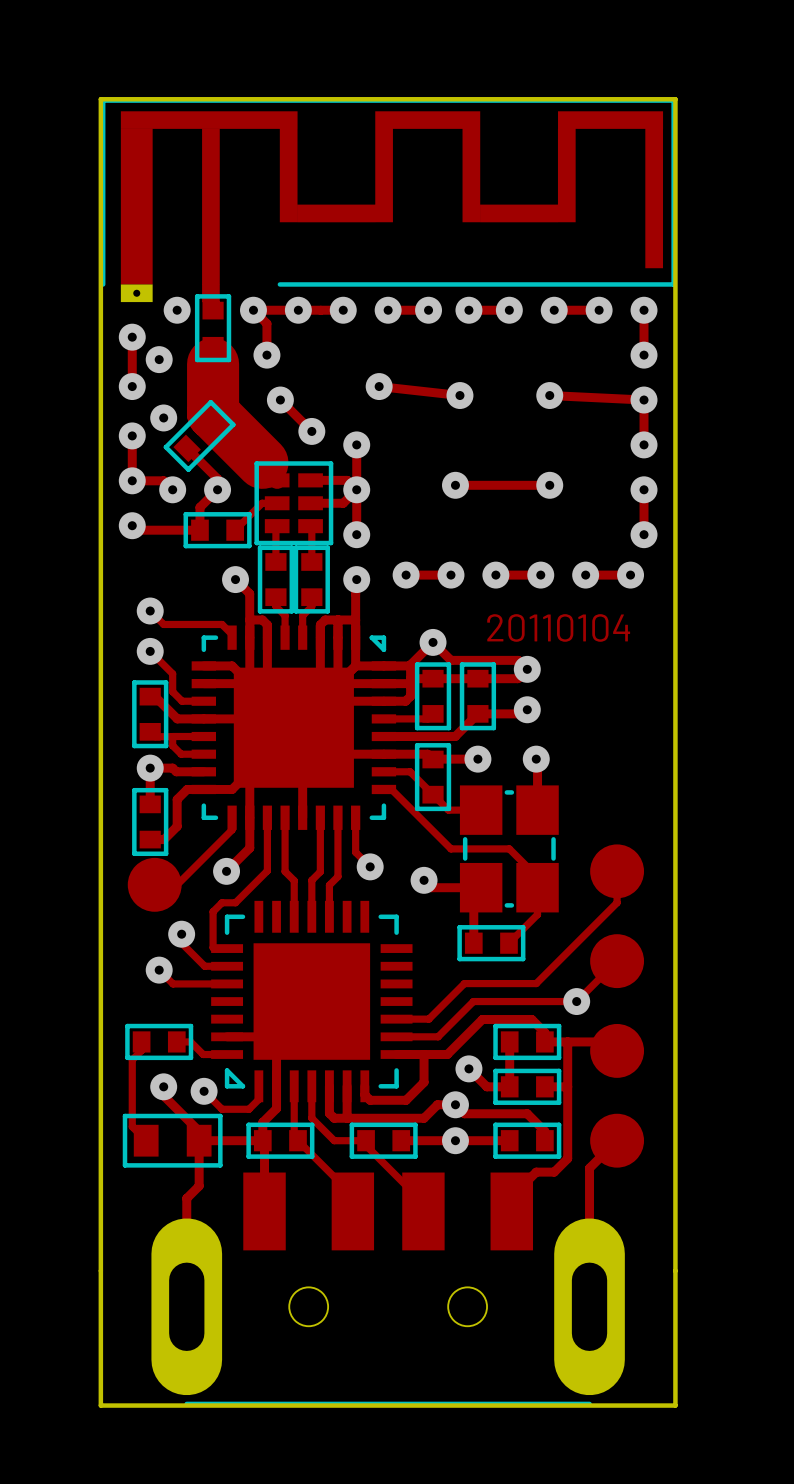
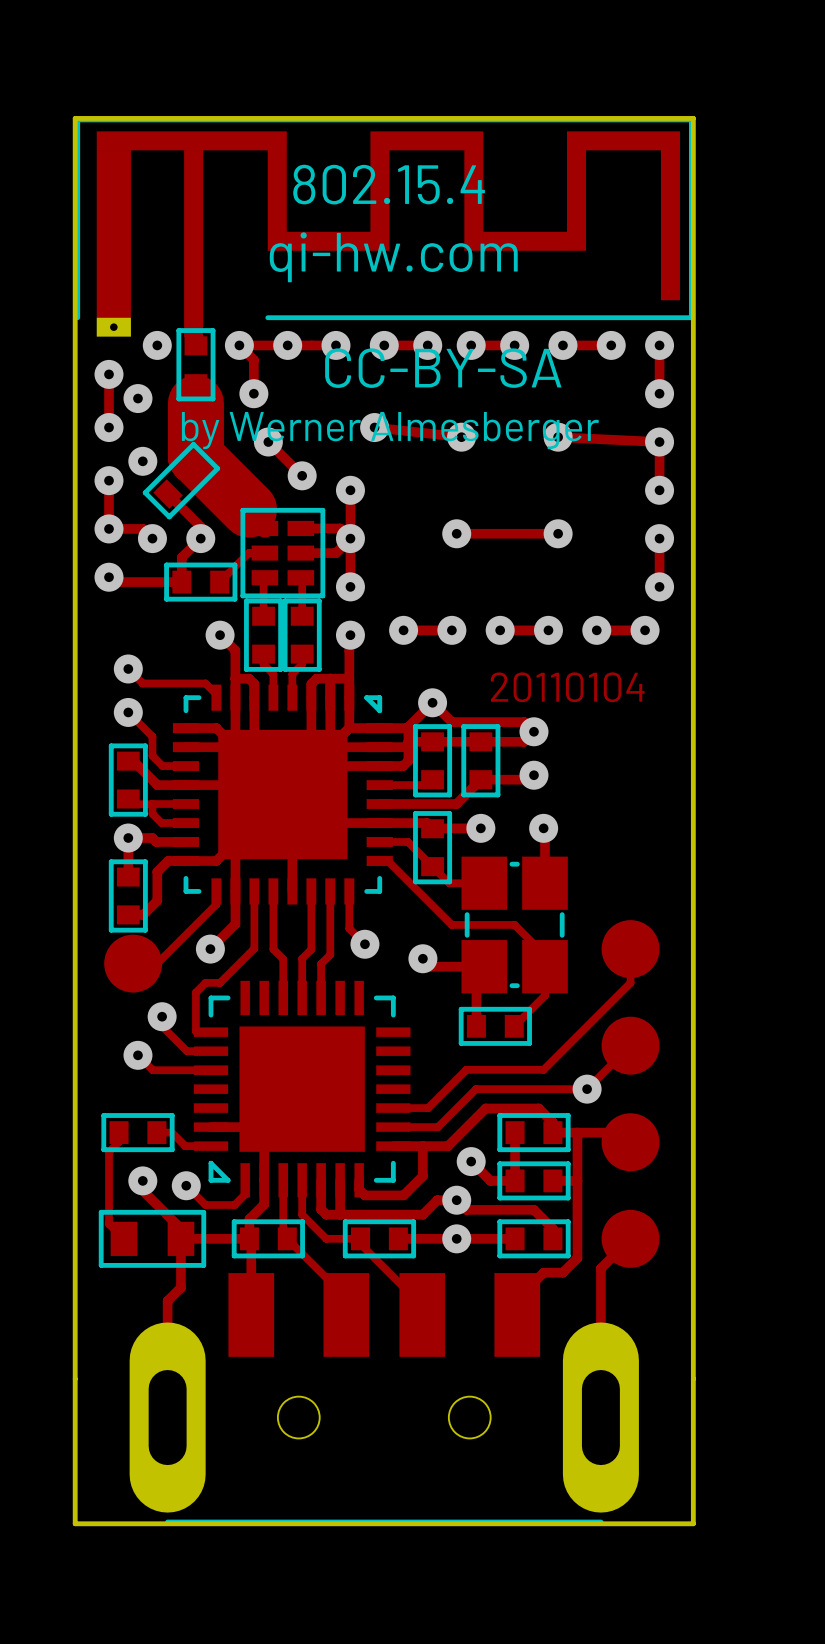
text: none -> 802.15.4 (389, 184)
text: none -> qi-hw.com (393, 257)
text: none -> CC-BY-SA (443, 368)
text: none -> by Werner Almesberger (390, 430)

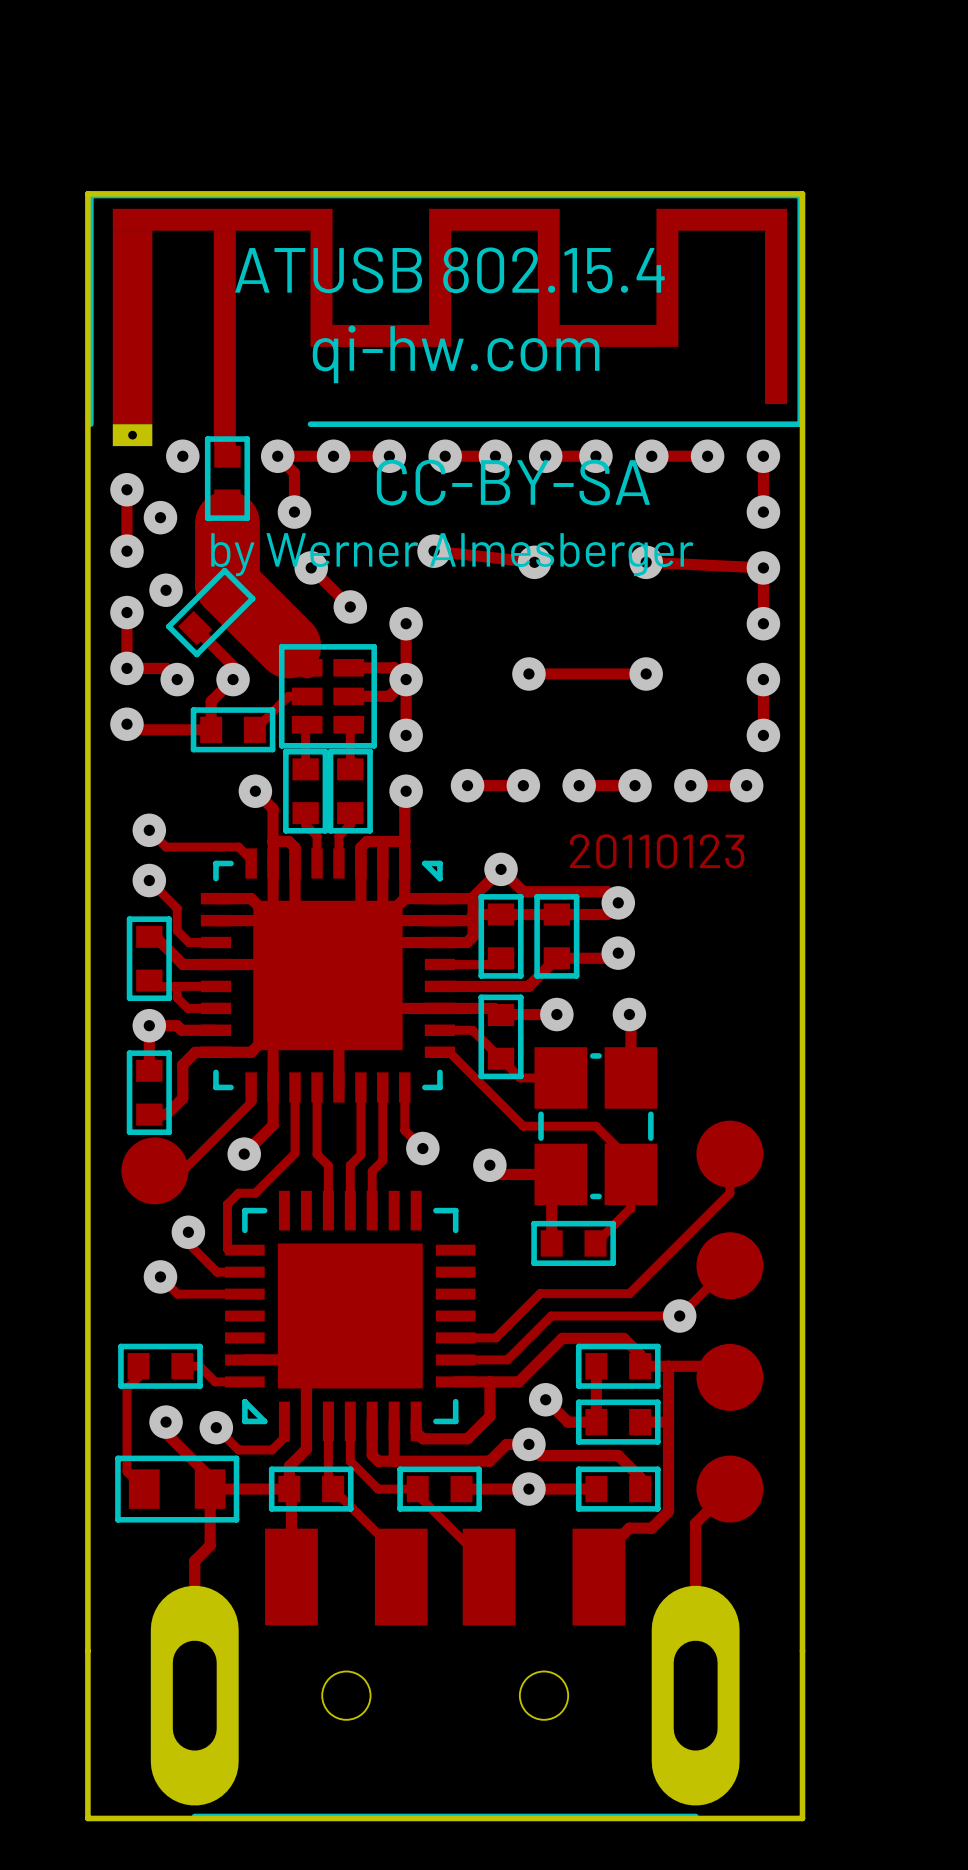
text: 802.15.4 (389, 184) -> ATUSB 802.15.4 (449, 270)
text: 20110104 (567, 687) -> 20110123 (657, 851)

